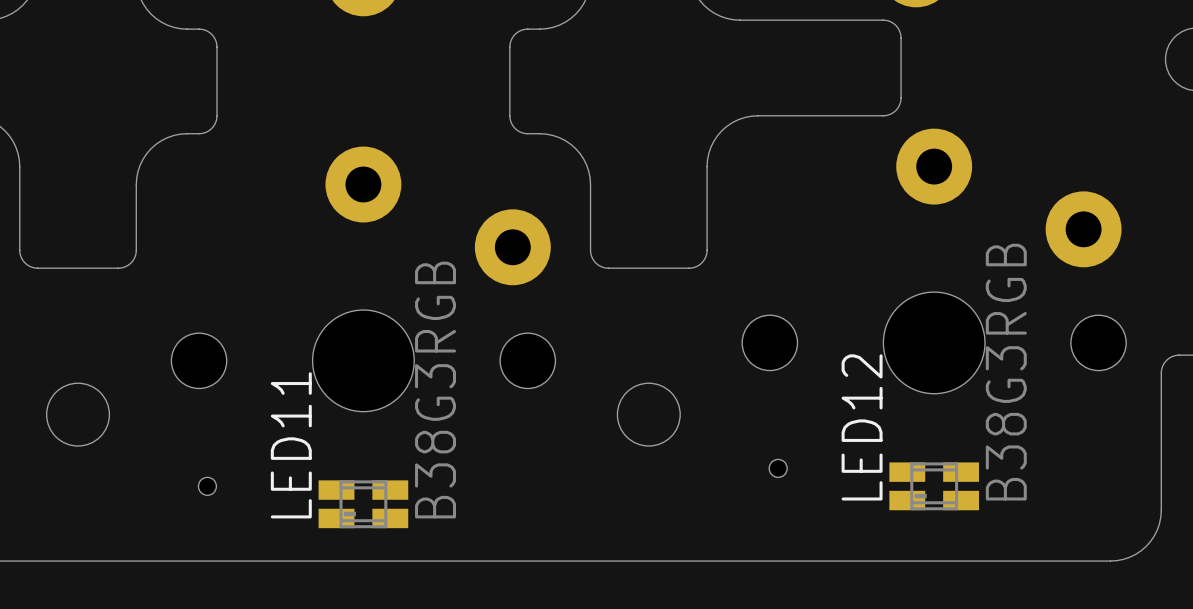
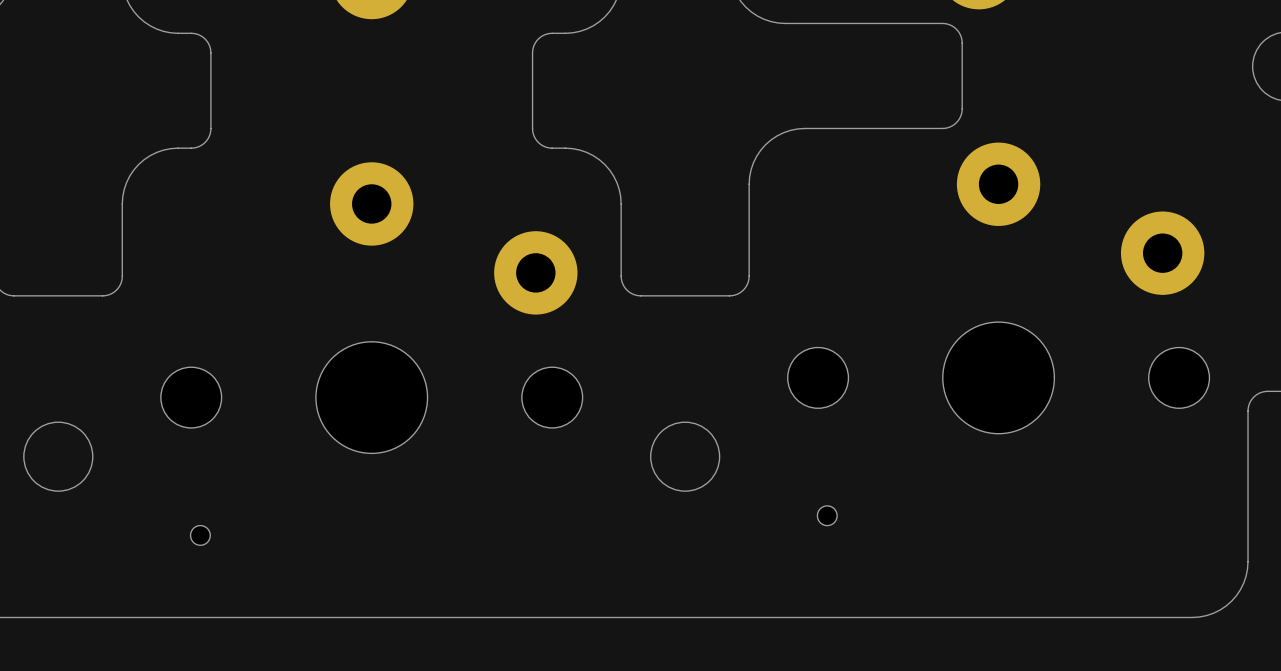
LED12: B38G3RGB (934, 486) -> none
LED11: B38G3RGB (363, 504) -> none

